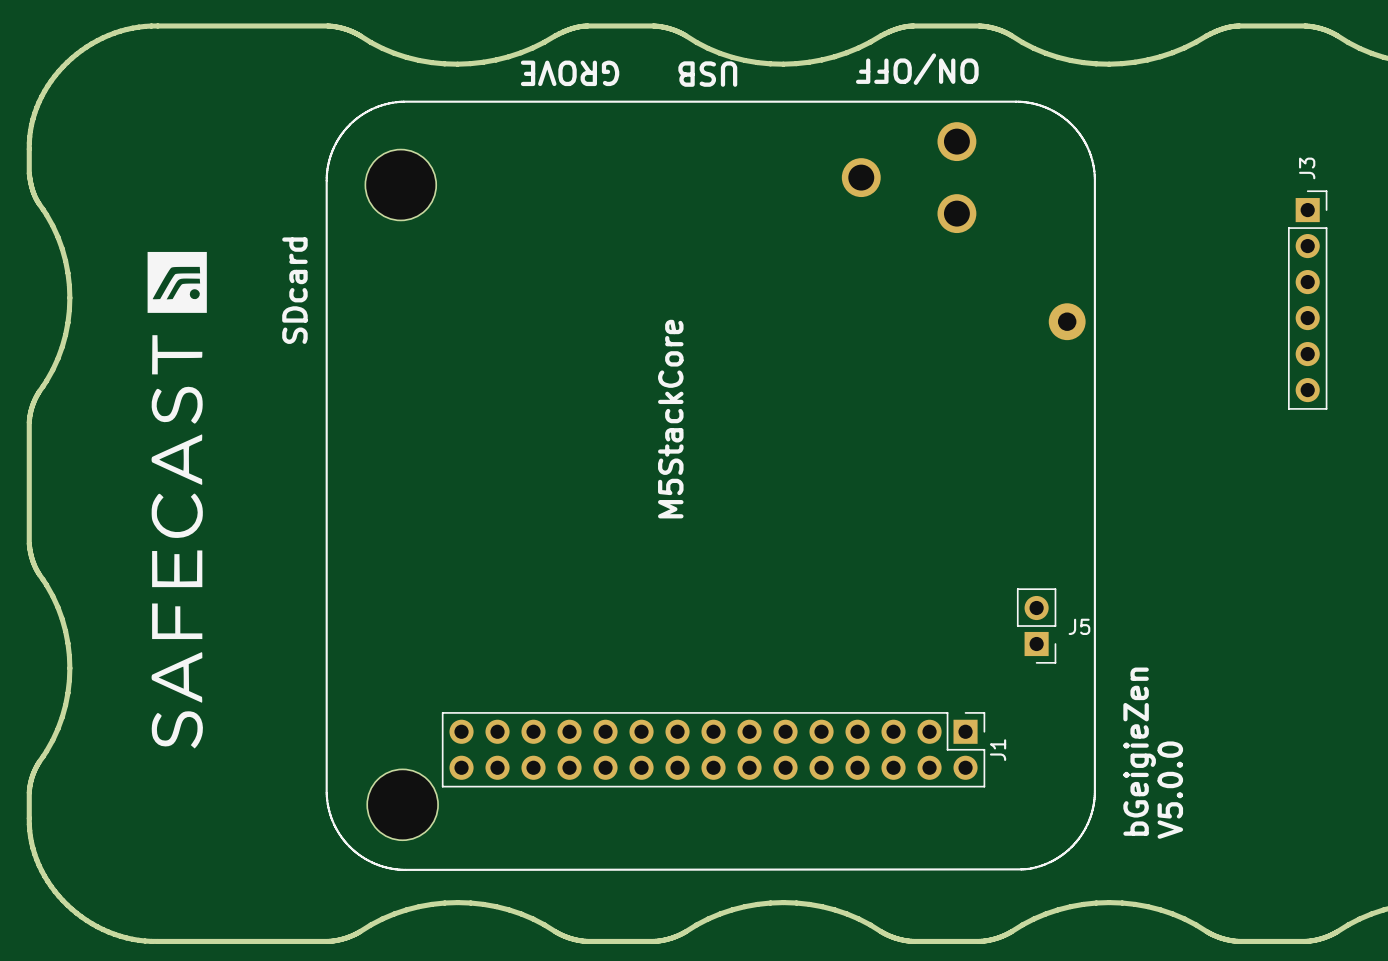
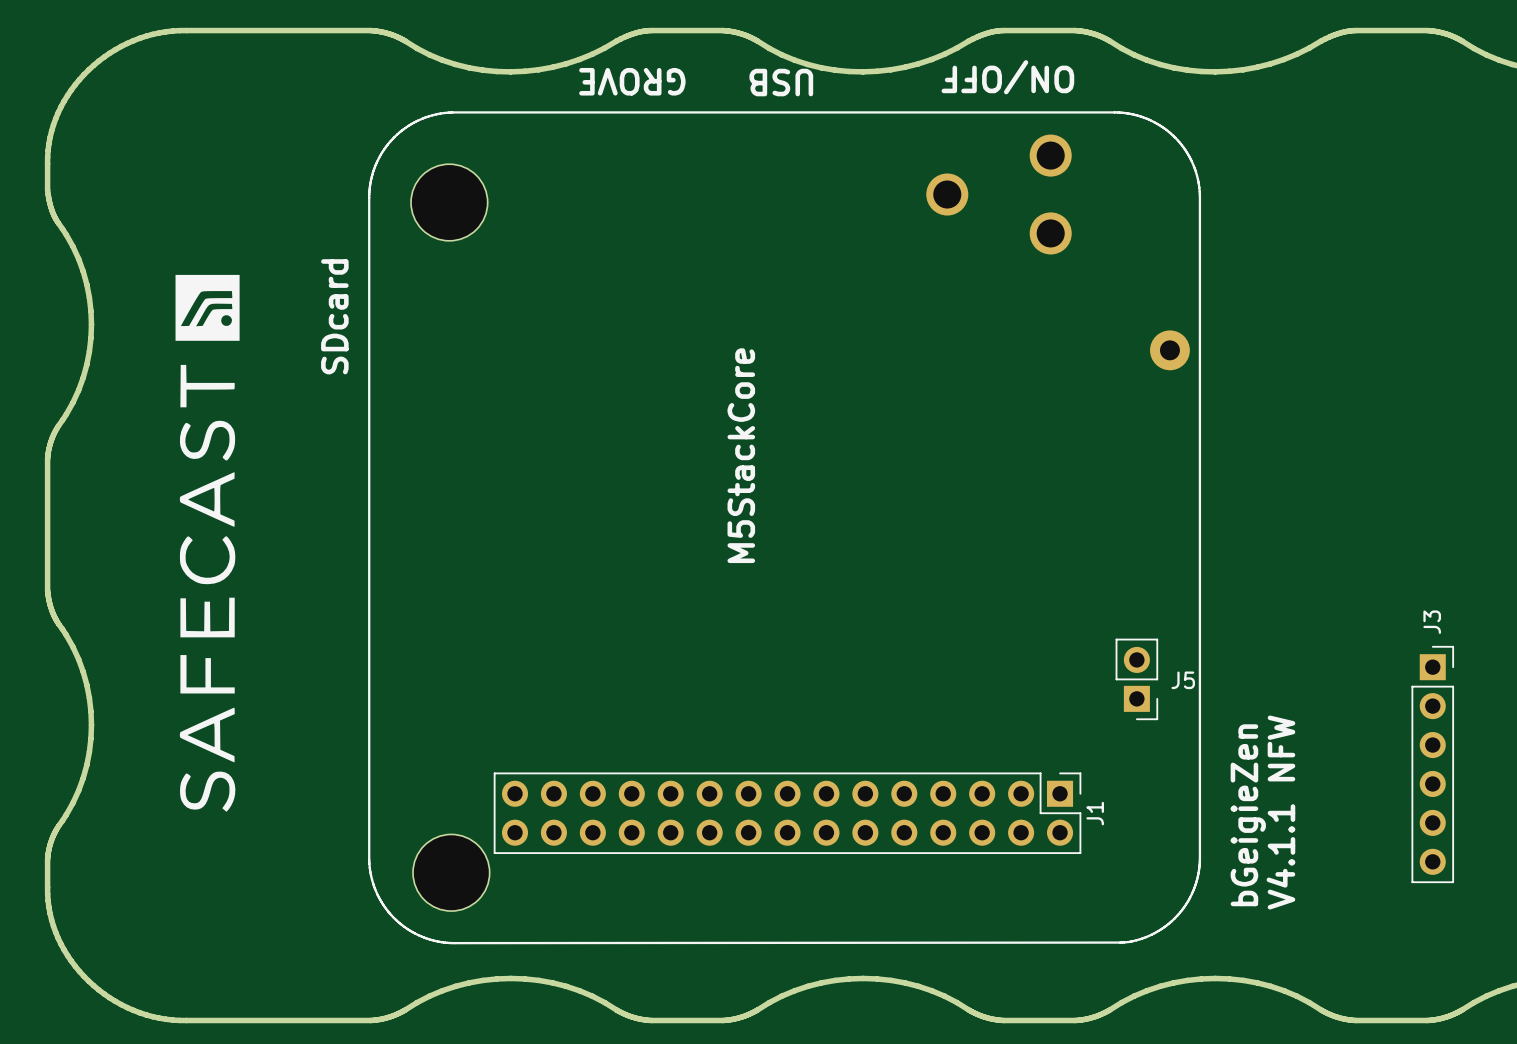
J3 position: (1307, 300) -> (1432, 764)
text: V5.0.0 (1170, 790) -> V4.1.1 NFW (1280, 812)

